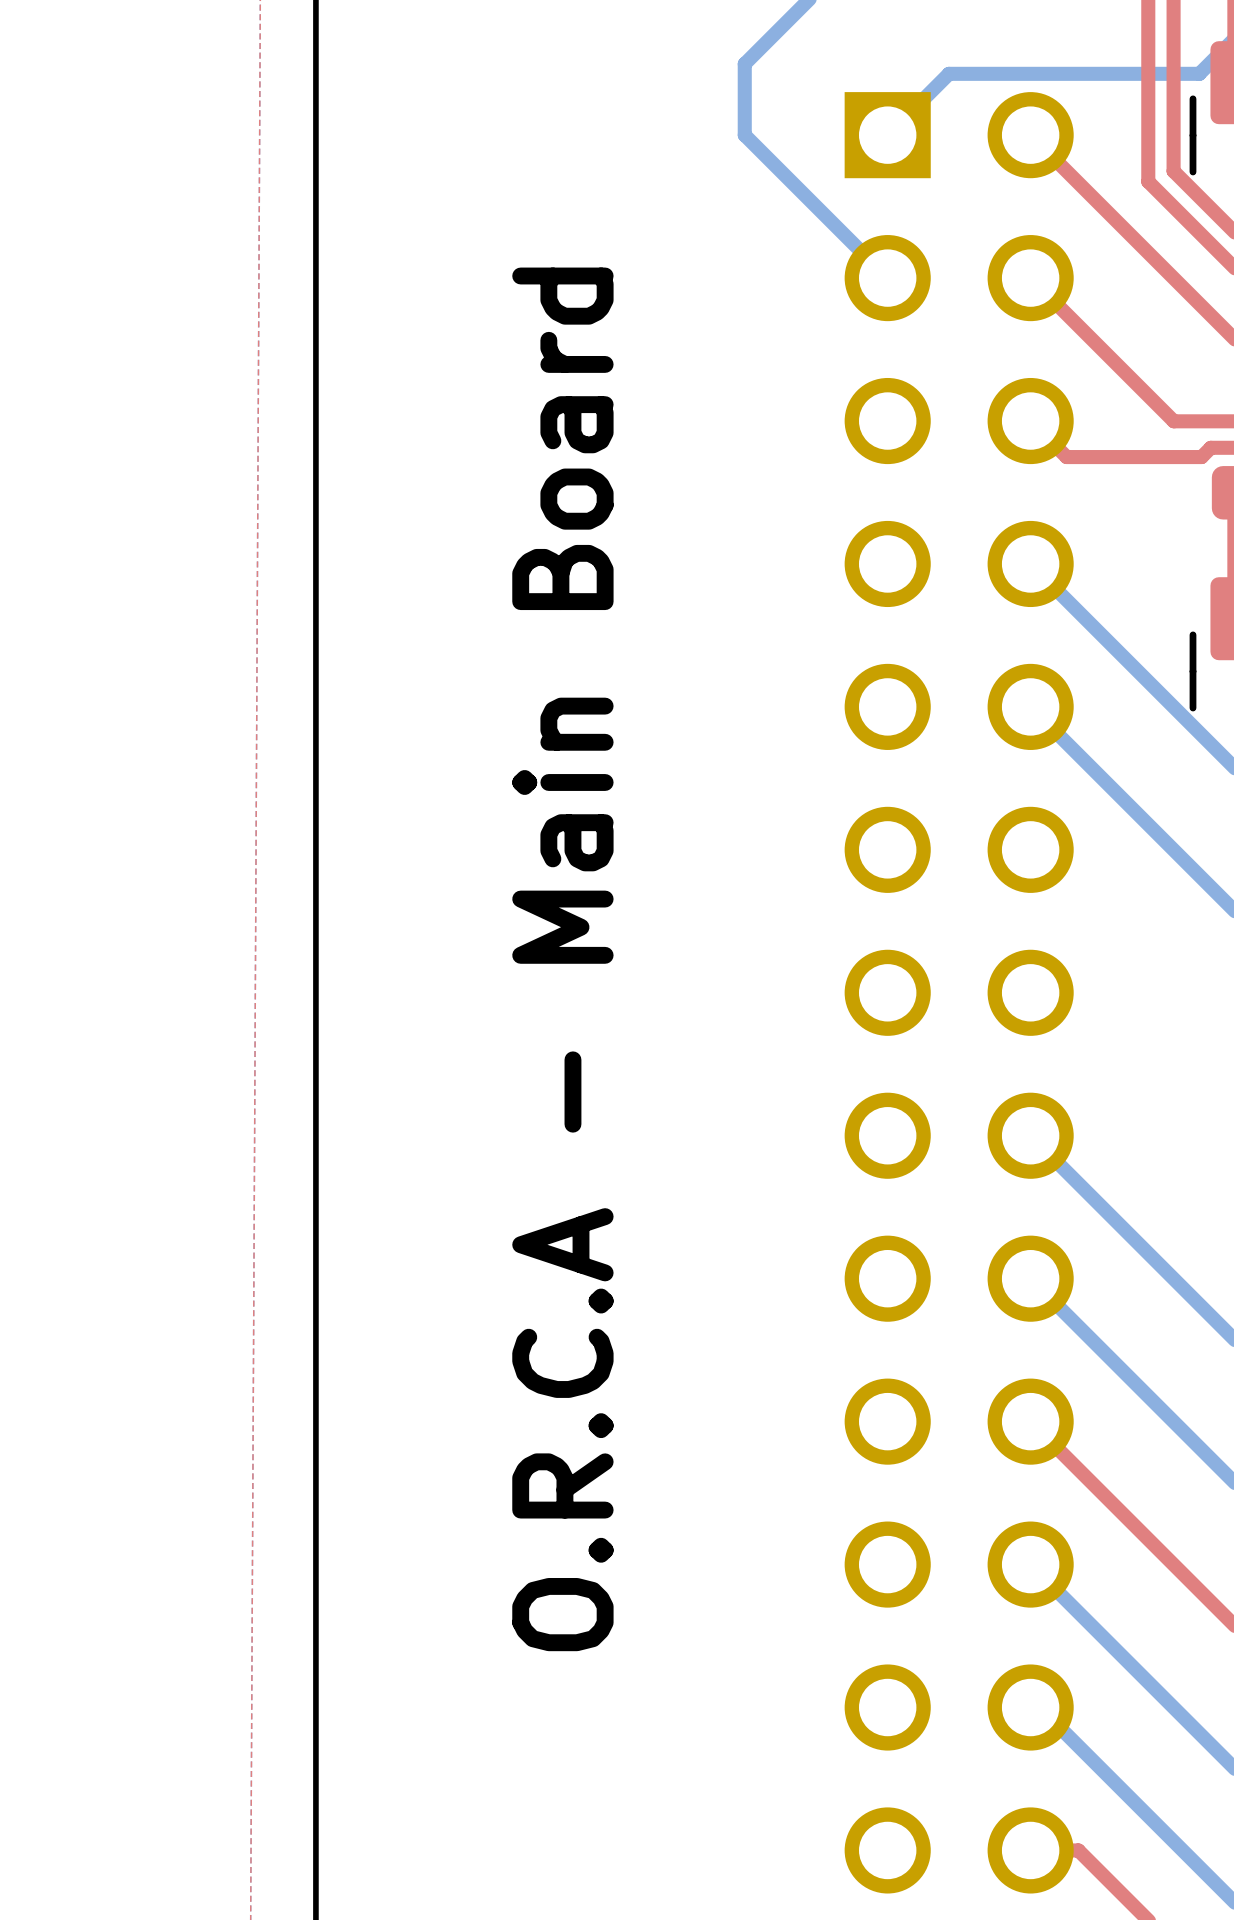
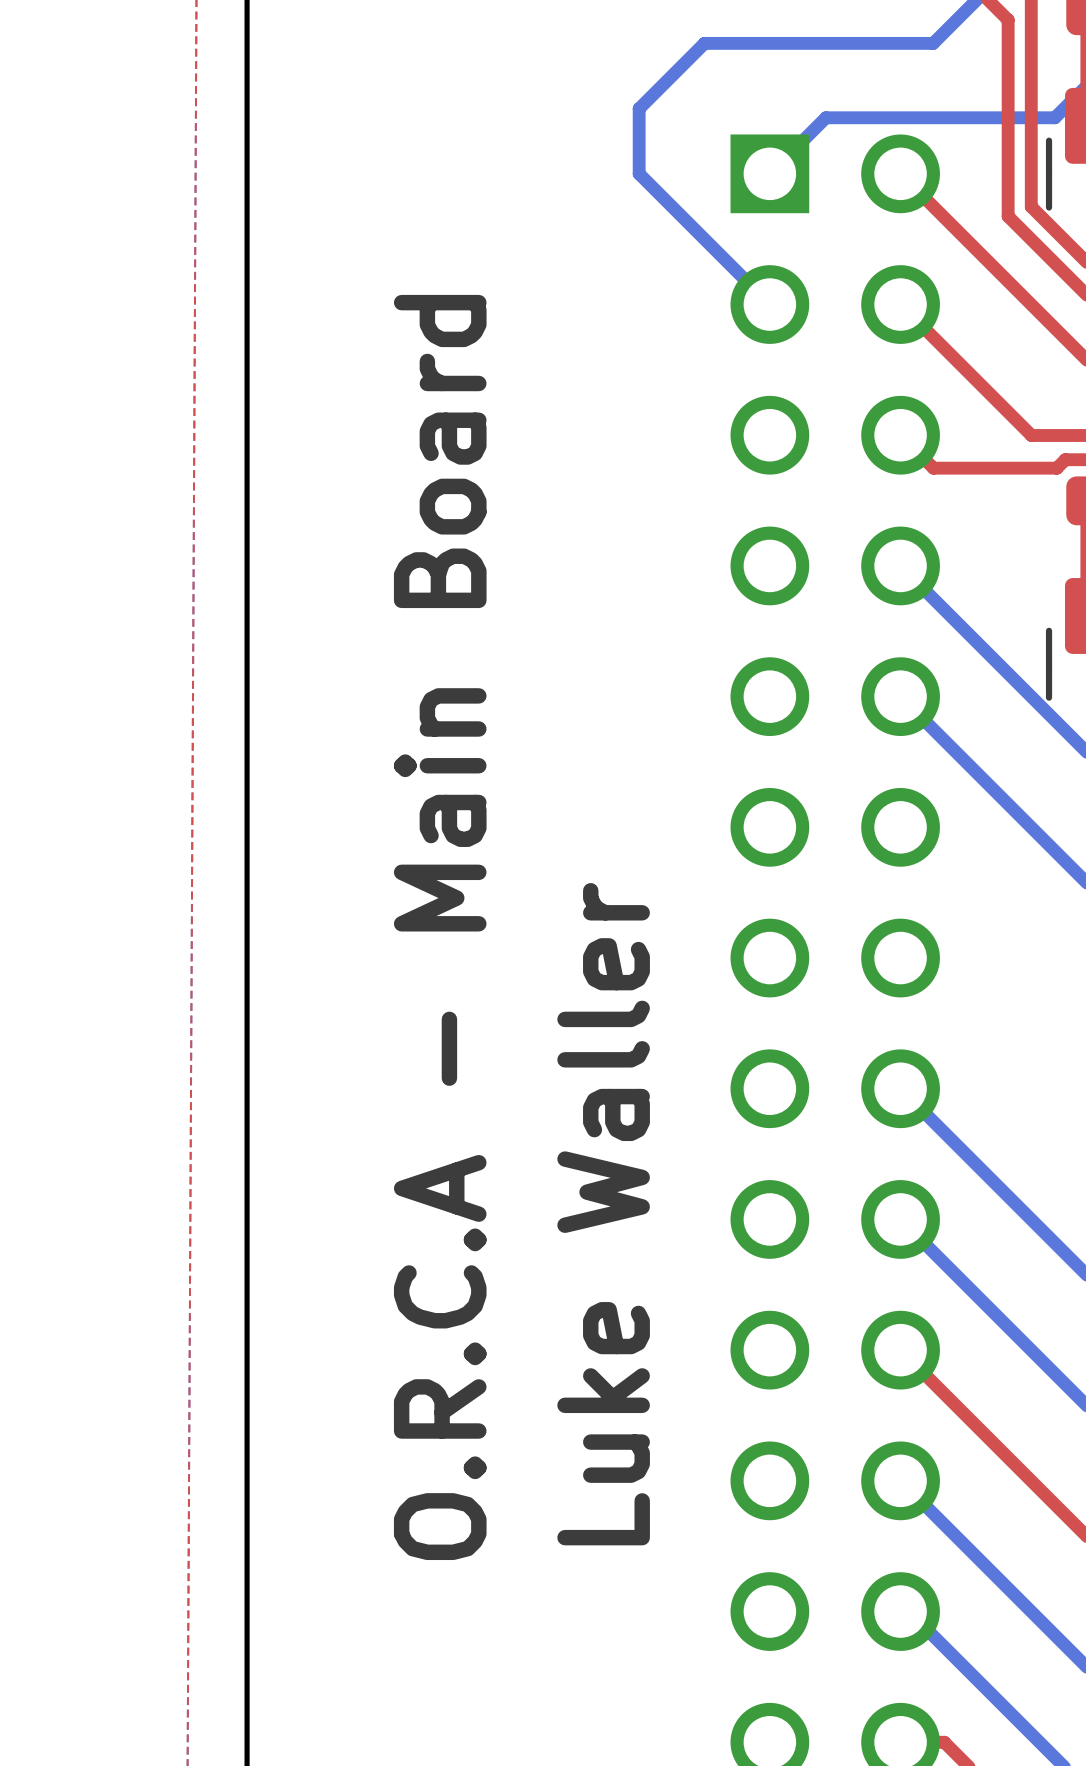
text position: O.R.C.A - Main Board (562, 959) -> O.R.C.A - Main Board (440, 927)
text: none -> Luke Waller (603, 1214)

